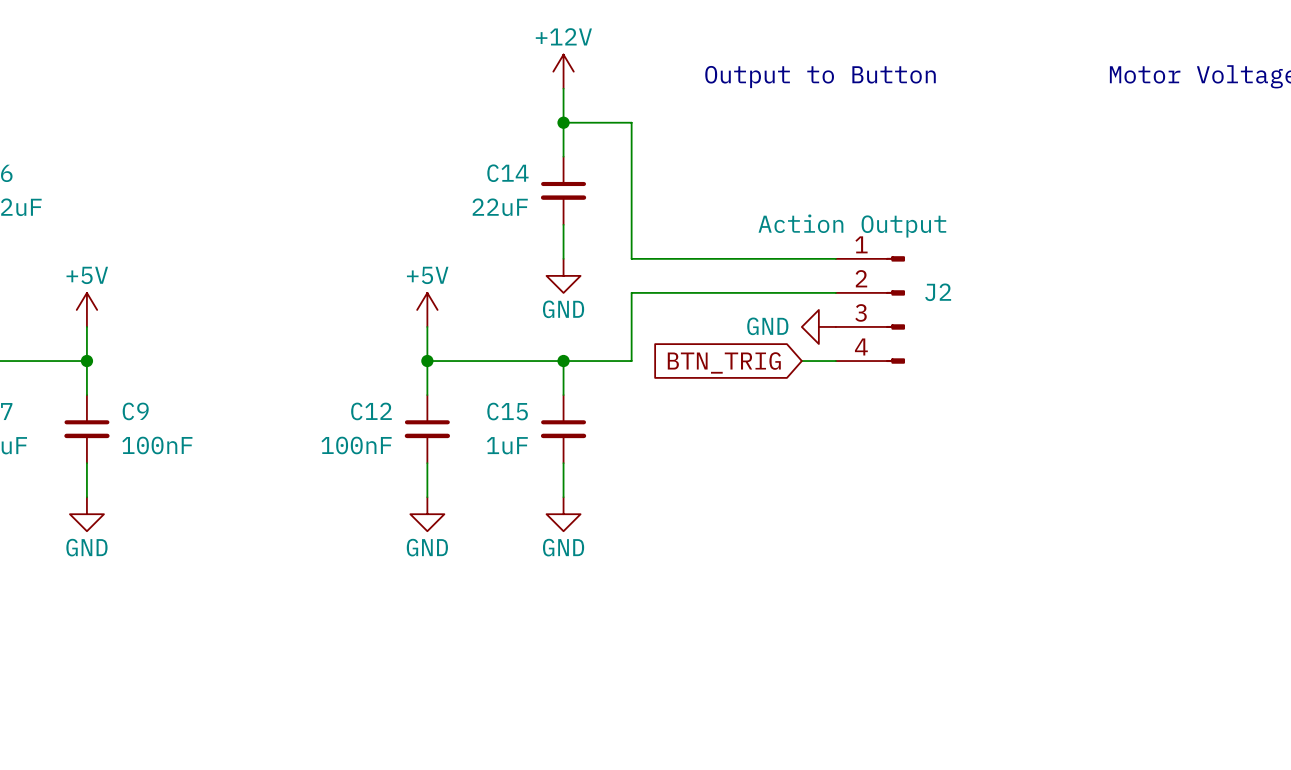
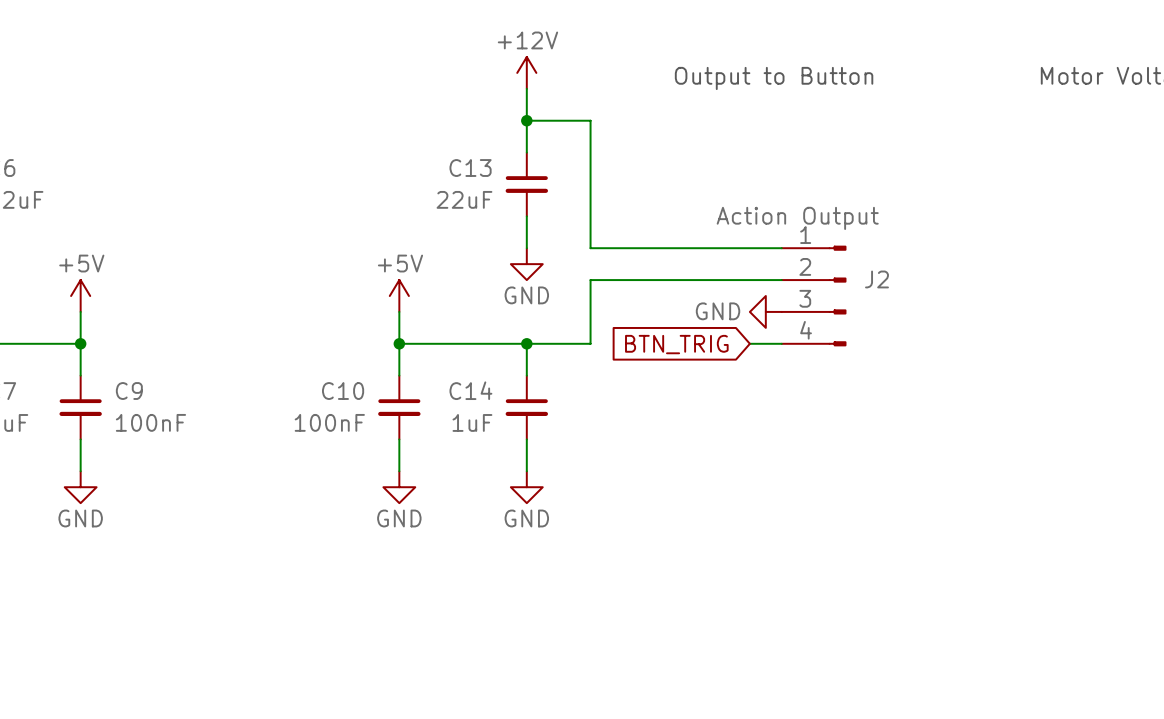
C14 name: C14 (507, 173) -> C13 (470, 168)
C12 name: C12 (371, 411) -> C10 (343, 391)
C15 name: C15 (507, 411) -> C14 (470, 390)

